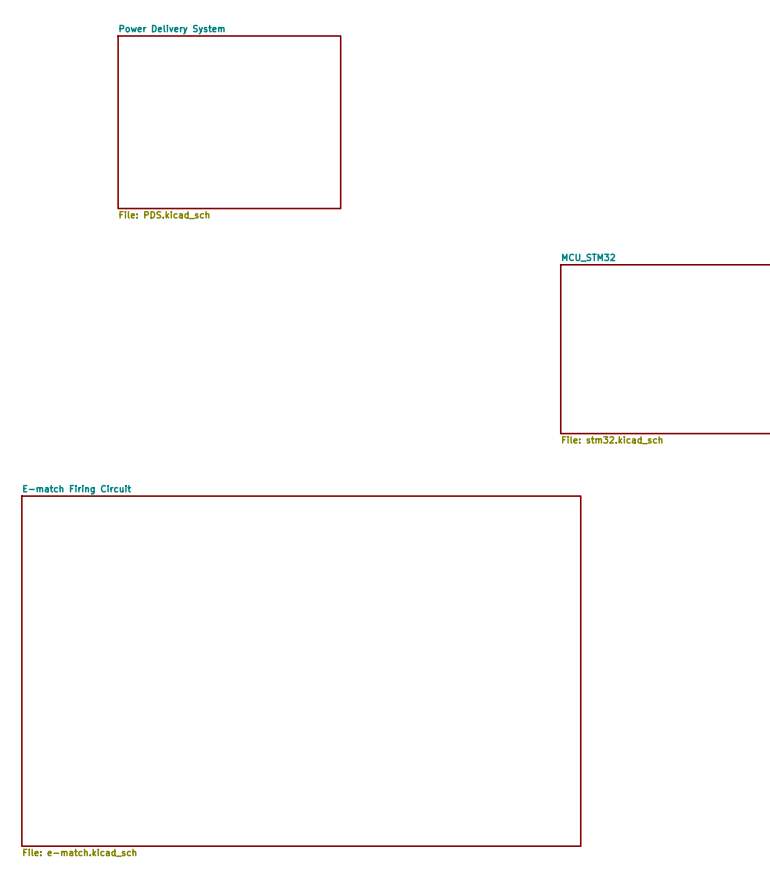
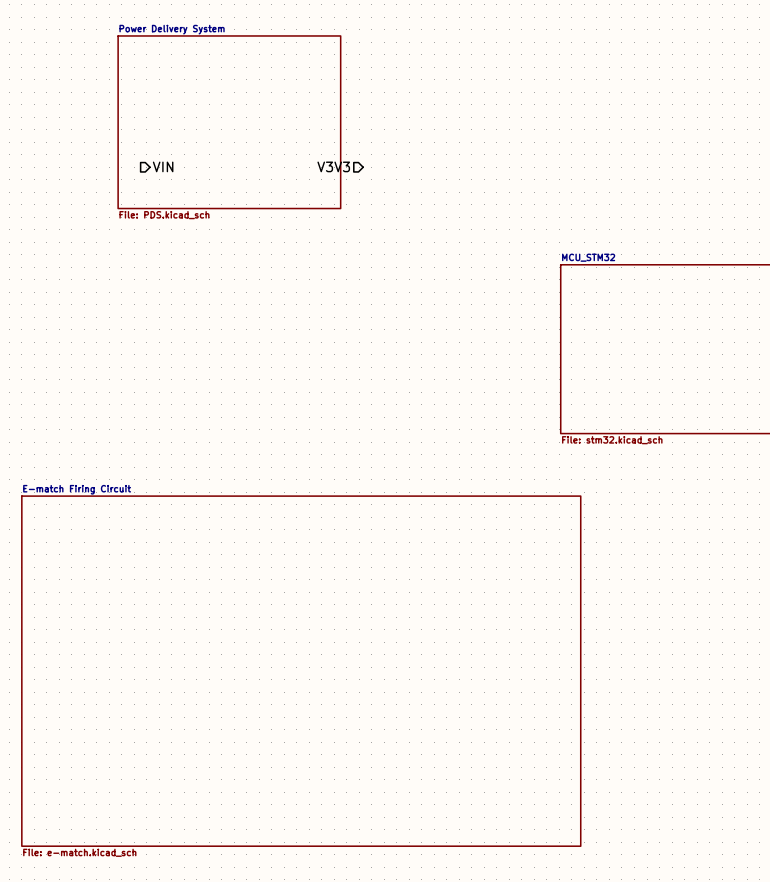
sheet pin: none -> VIN (163, 166)
sheet pin: none -> V3V3 (333, 166)

